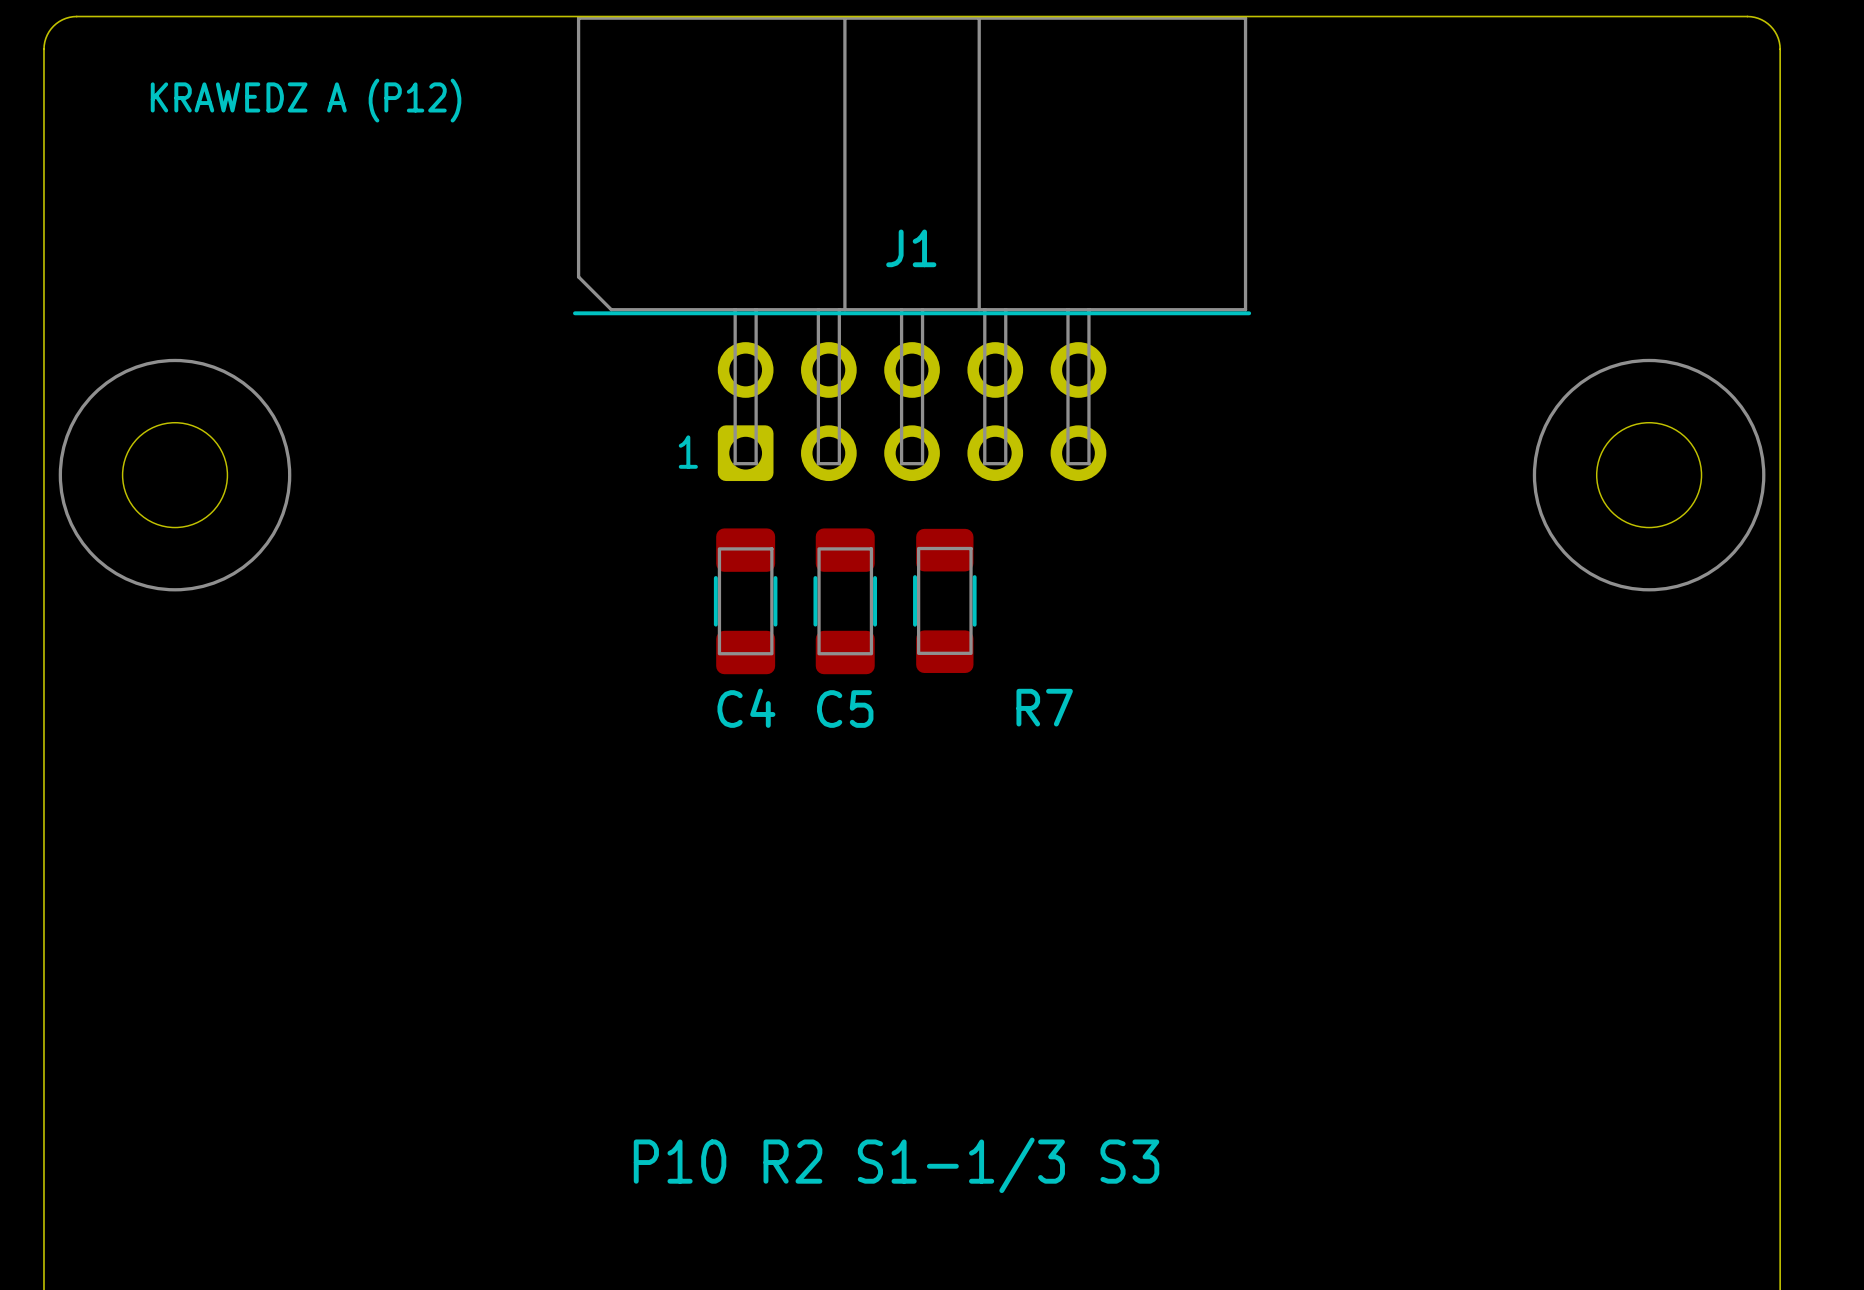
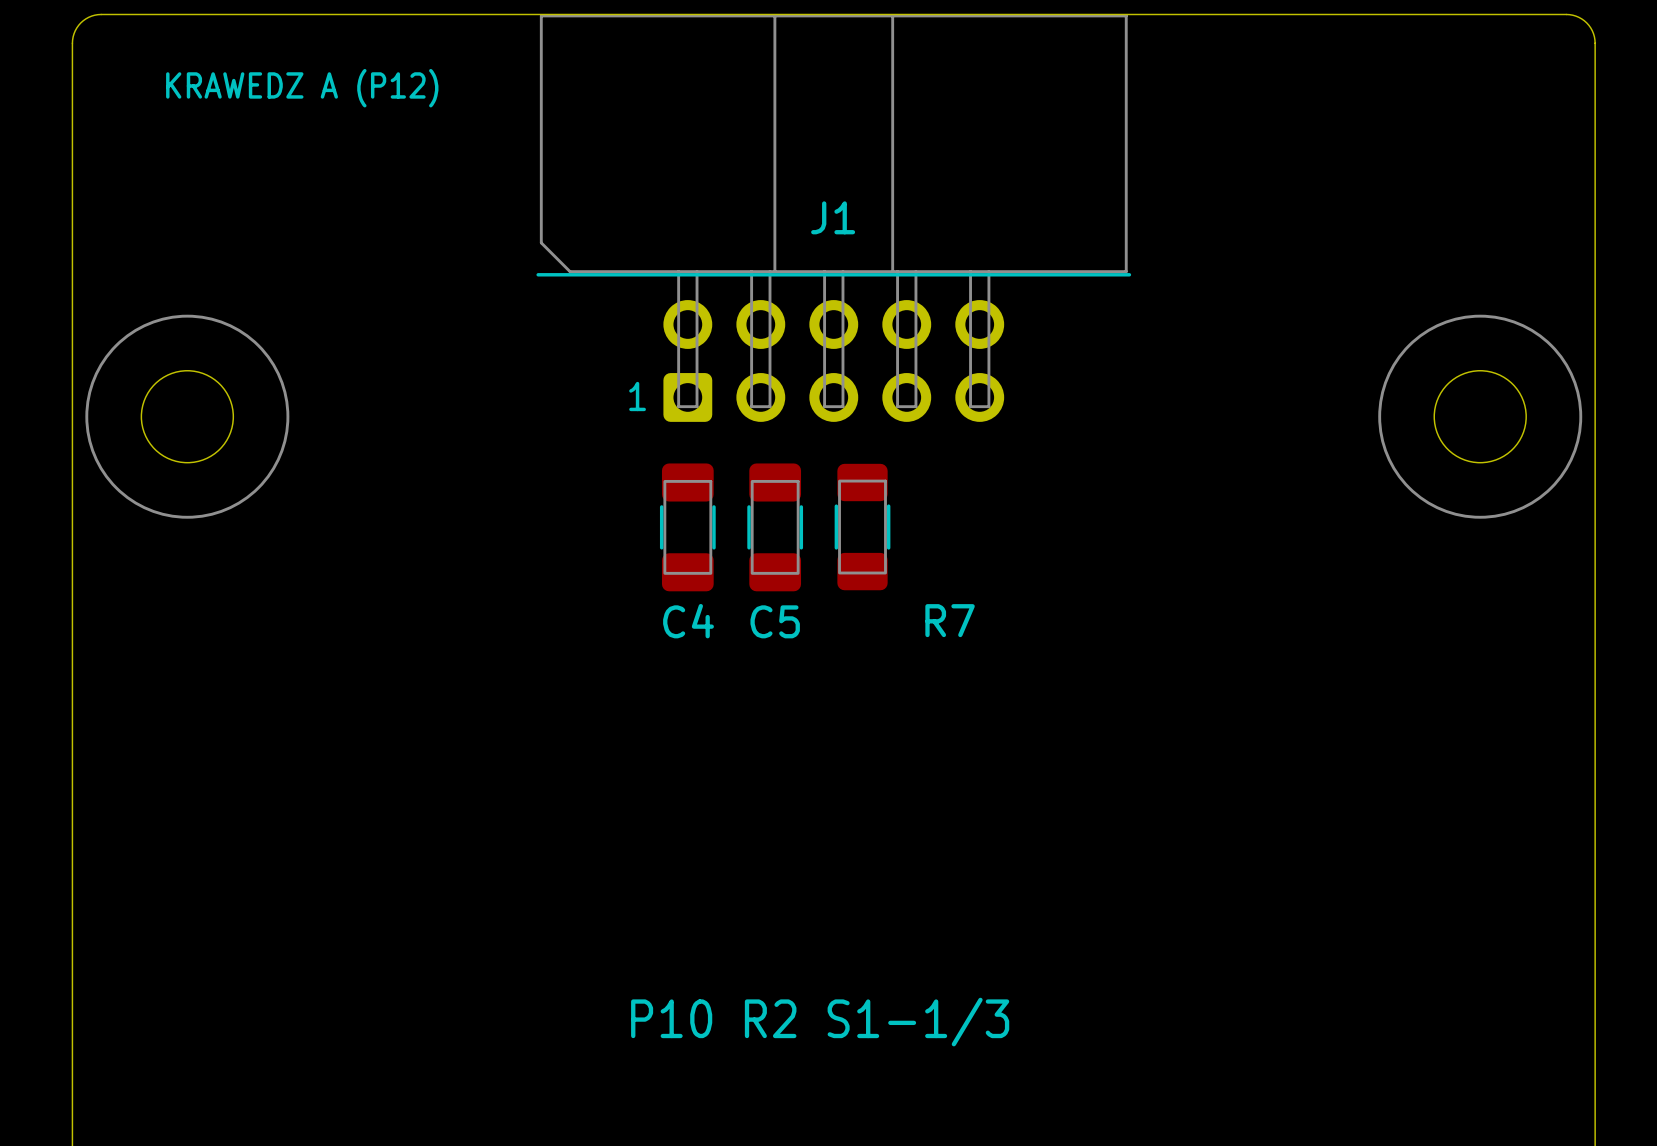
text: P10 R2 S1-1/3 S3 (896, 1165) -> P10 R2 S1-1/3 (820, 1022)

